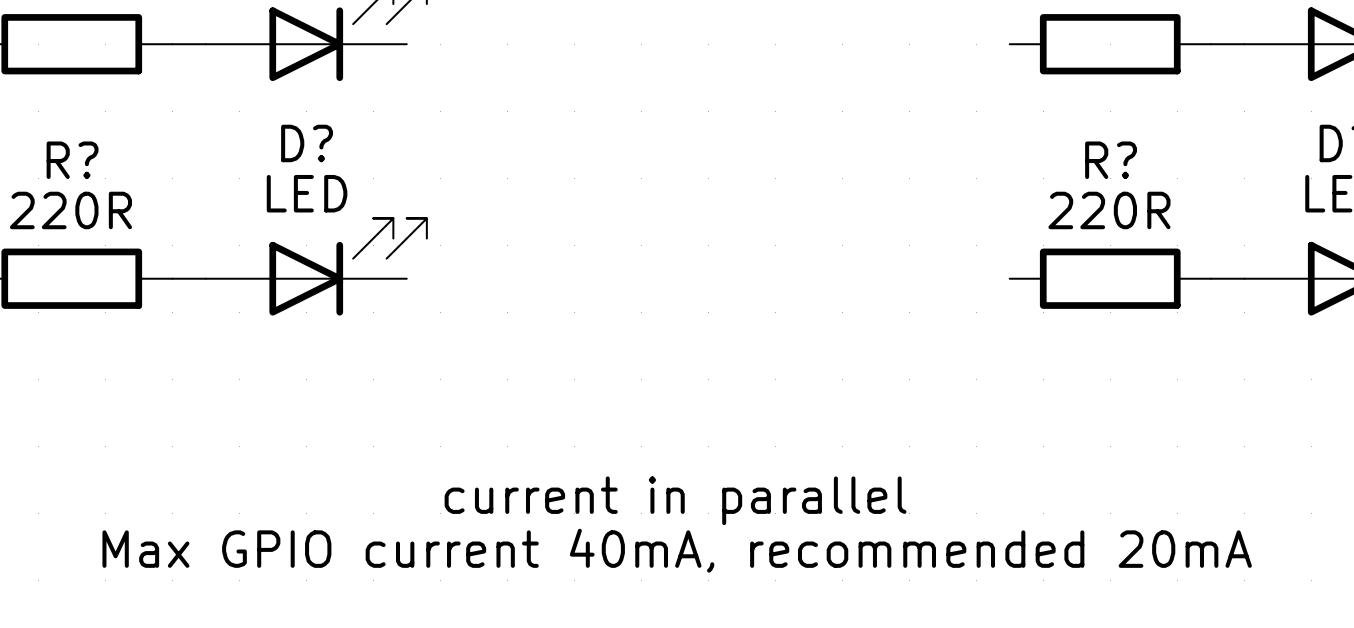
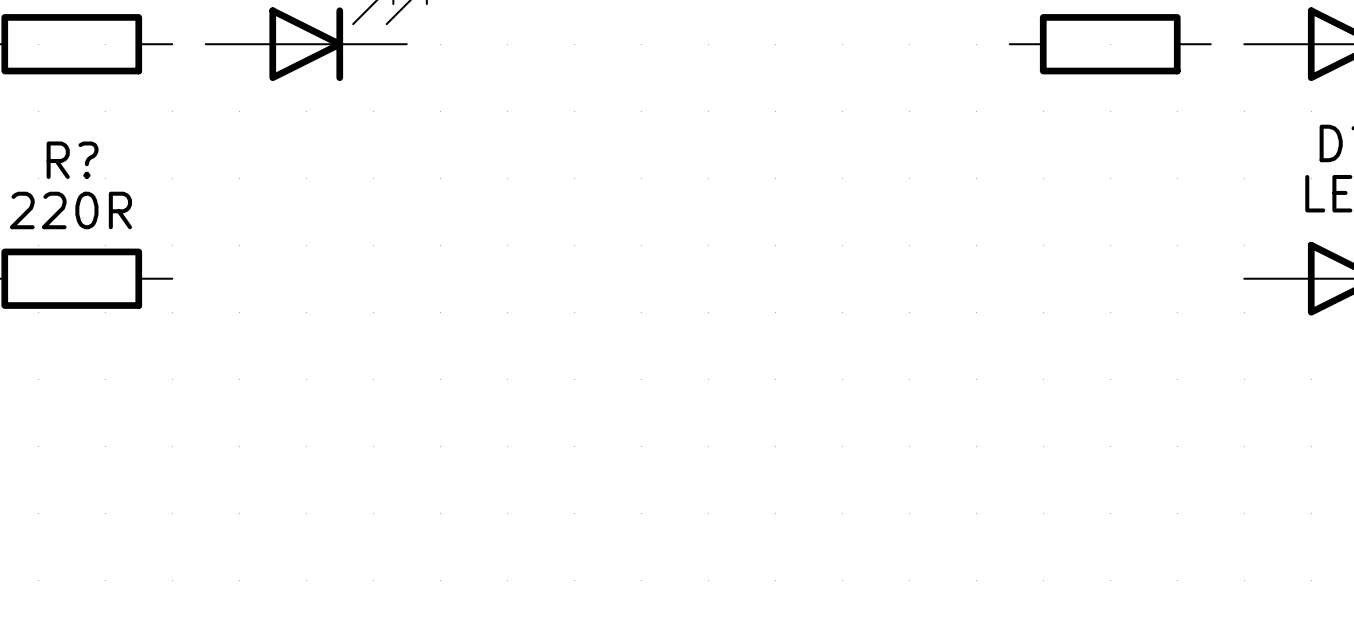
wire: (172, 44) (205, 44) -> none
wire: (1210, 44) (1244, 44) -> none
D?: LED (316, 267) -> none
wire: (172, 278) (205, 278) -> none
R?: 220R (1110, 278) -> none
wire: (1210, 278) (1244, 278) -> none
text: current in parallel (675, 500) -> none
text: Max GPIO current 40mA, recommended 20mA (677, 550) -> none

